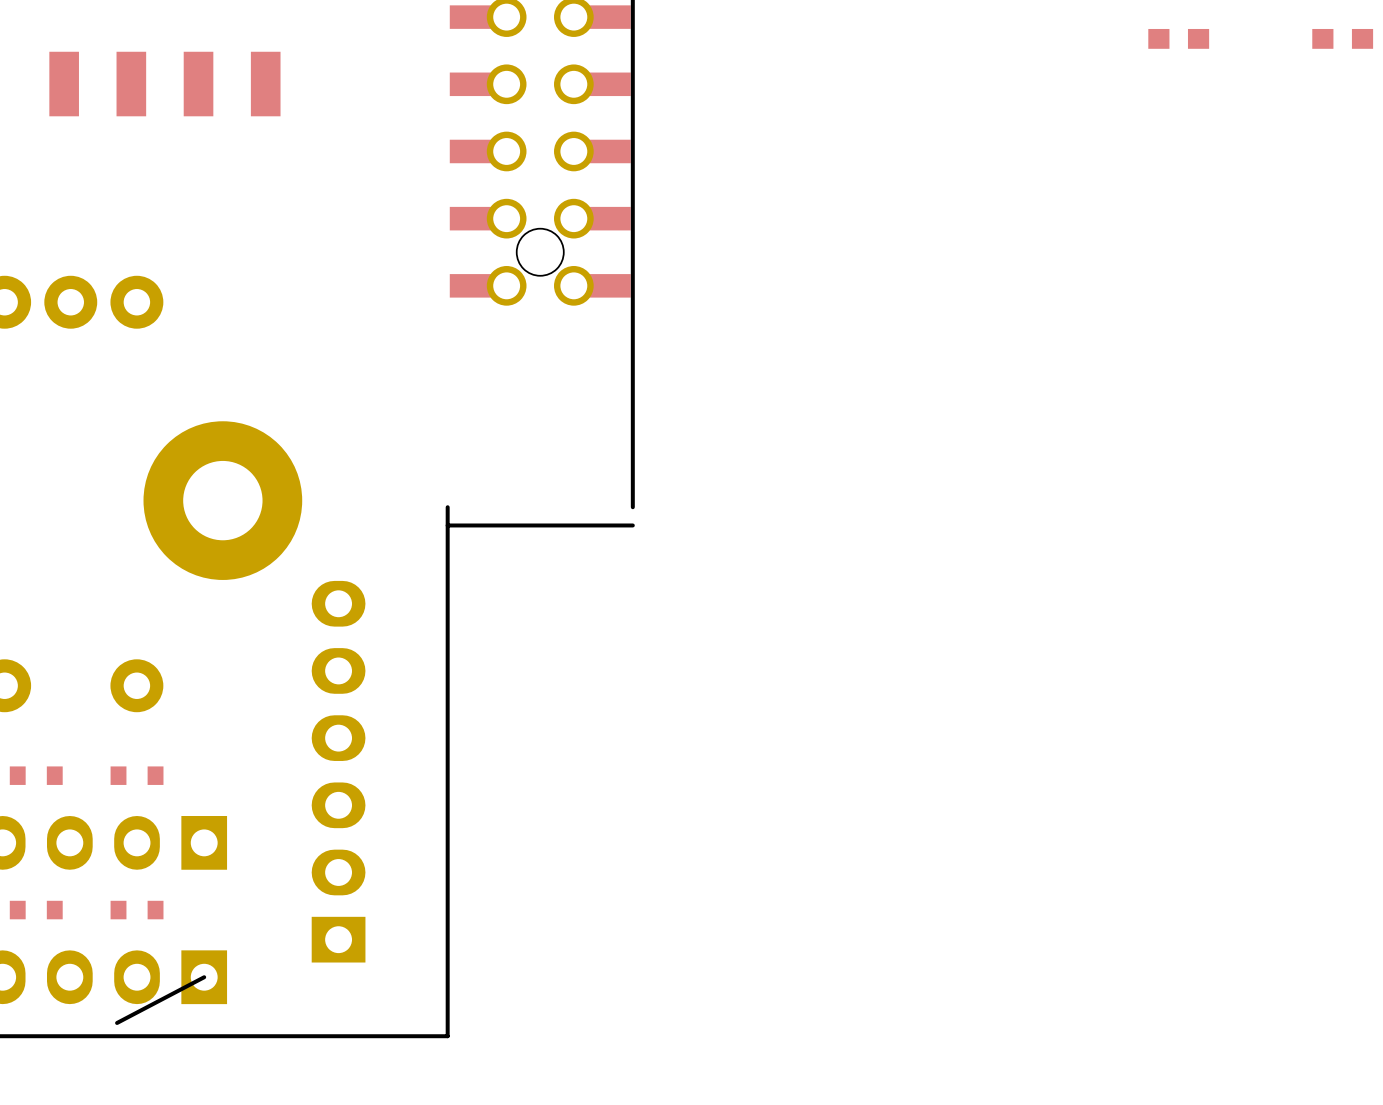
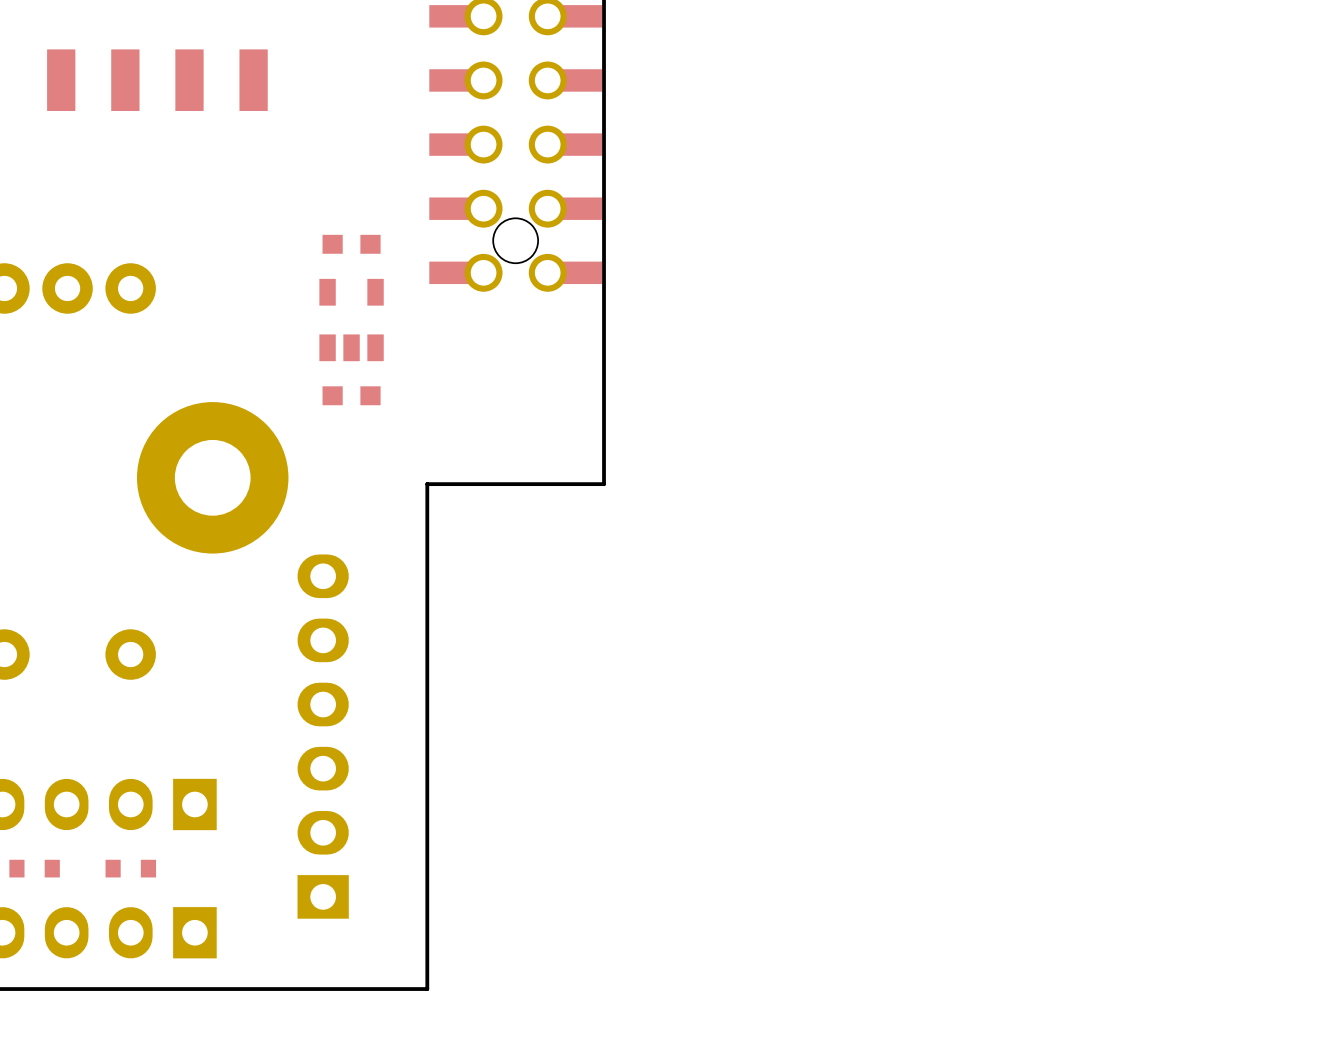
part: (1178, 38) -> none
part: (1342, 38) -> none
part: none -> (351, 244)
part: none -> (351, 320)
part: none -> (351, 395)
board edge: (632, 525) (447, 525) -> (604, 484) (427, 484)
part: (36, 775) -> none
part: (137, 775) -> none
board edge: (204, 977) (117, 1022) -> none

